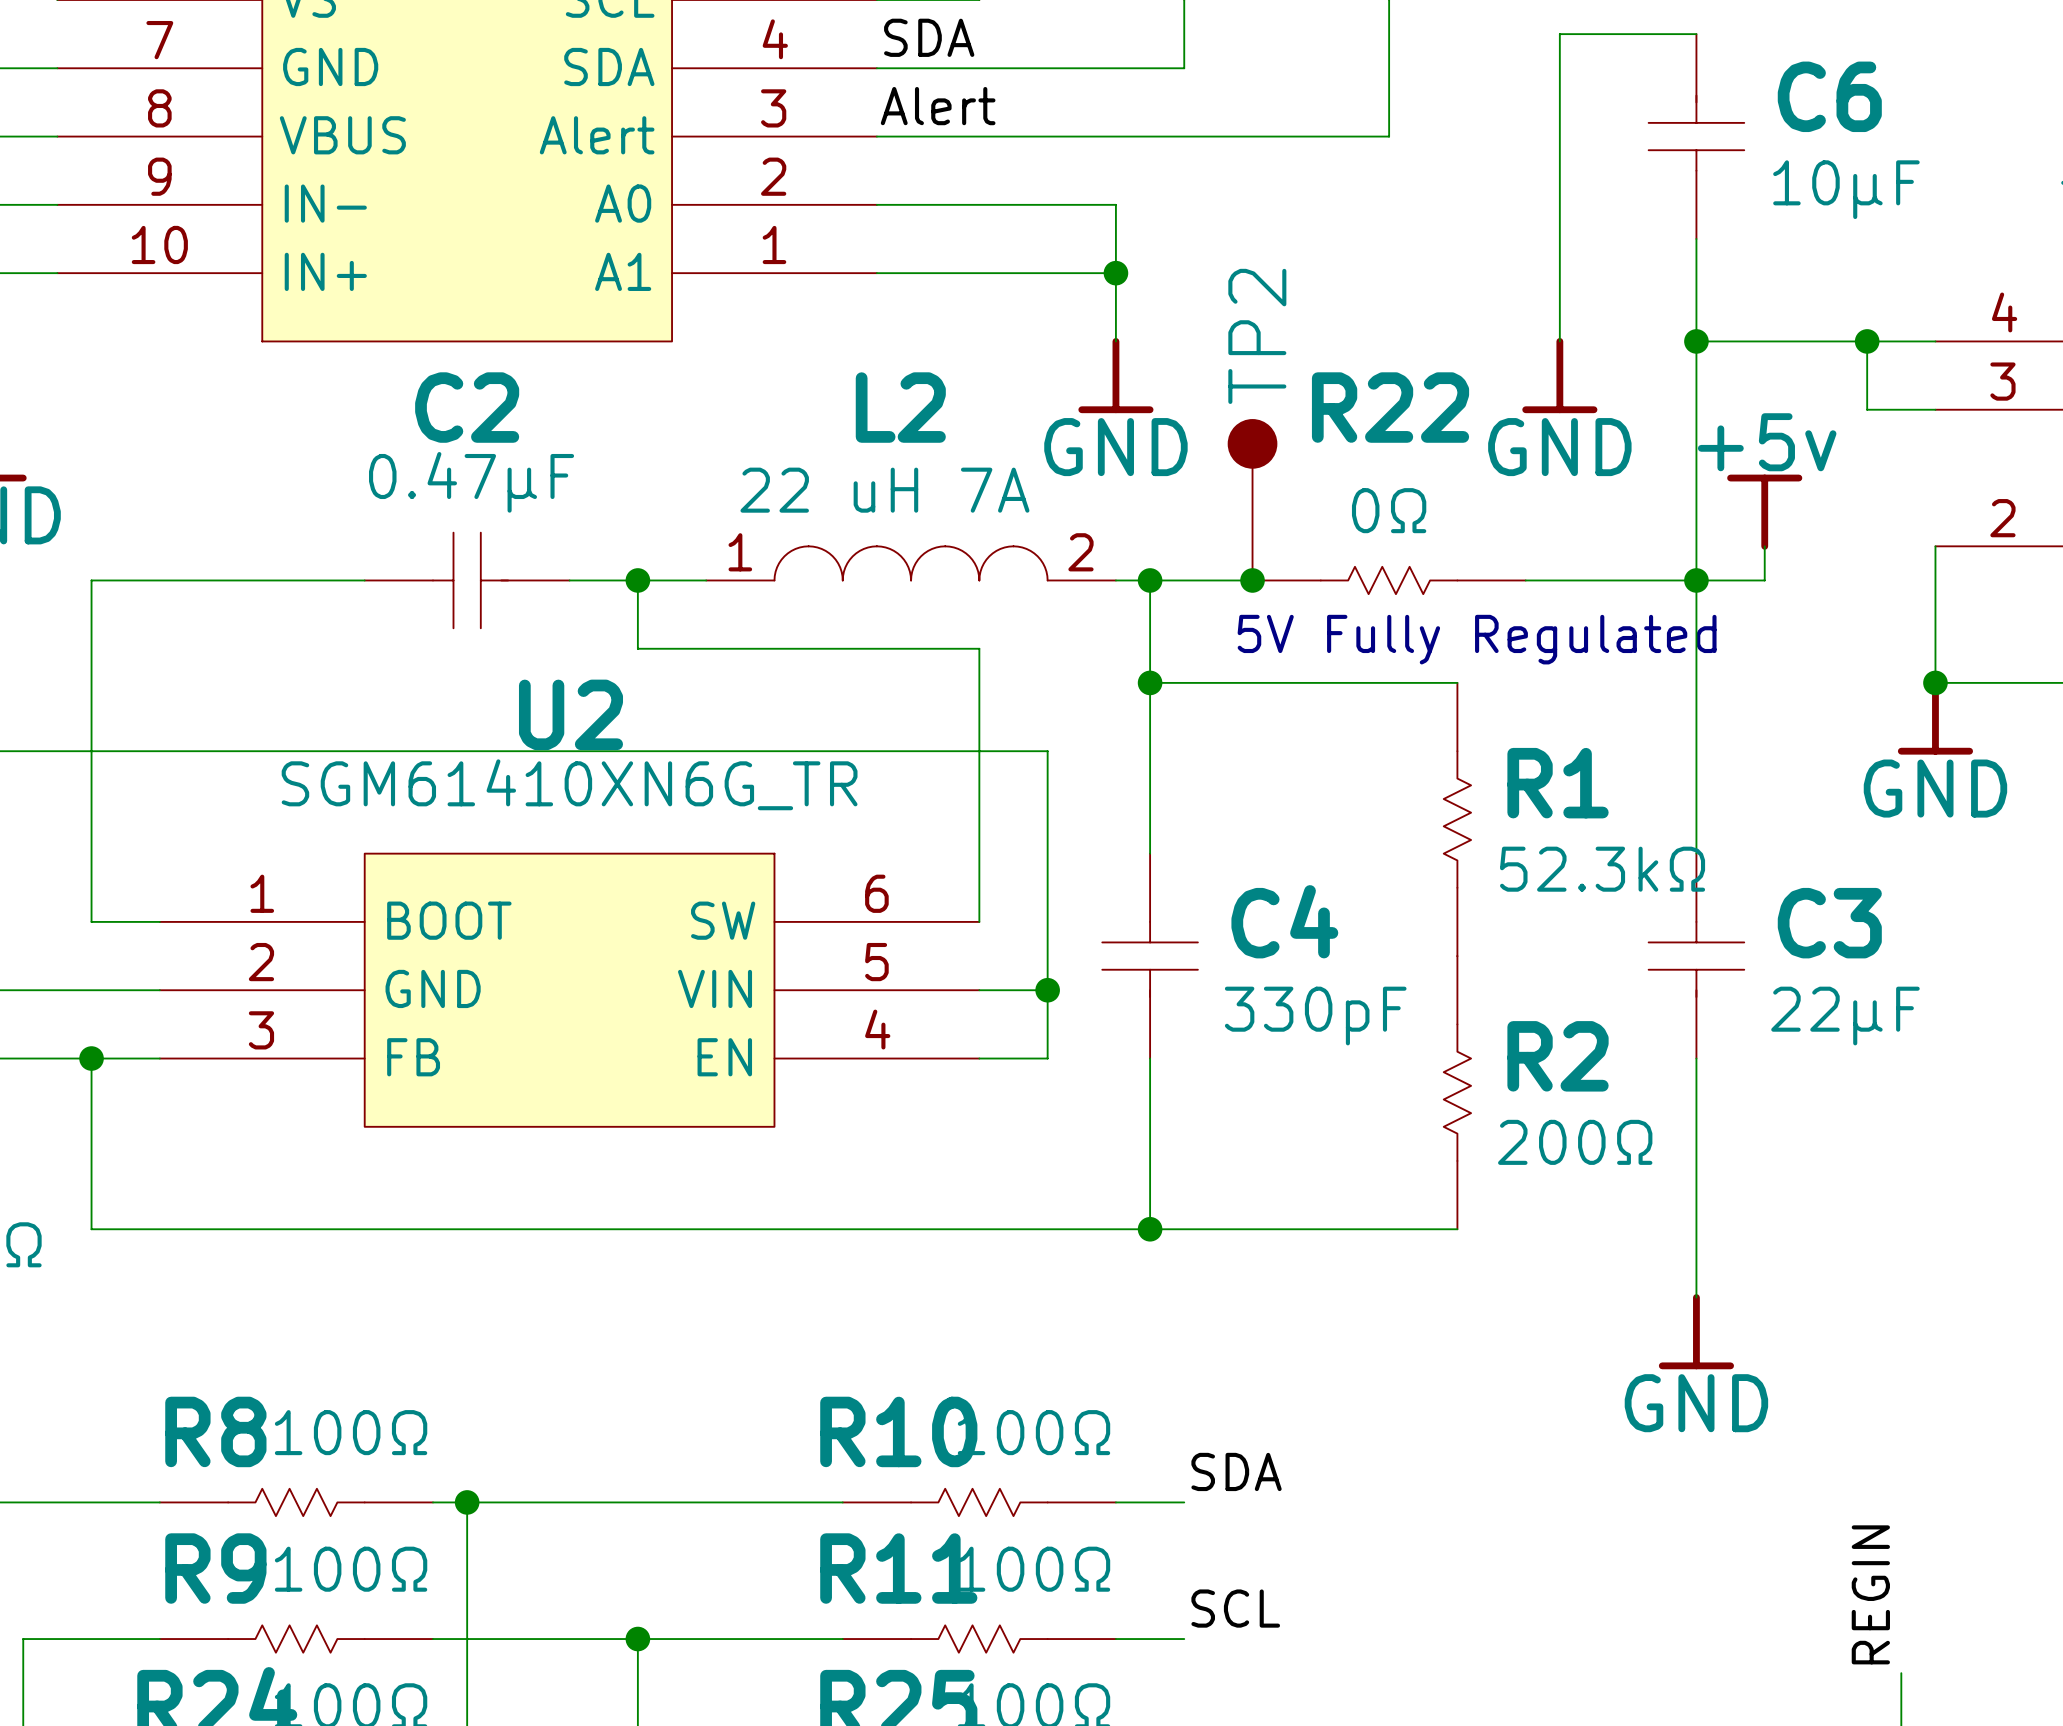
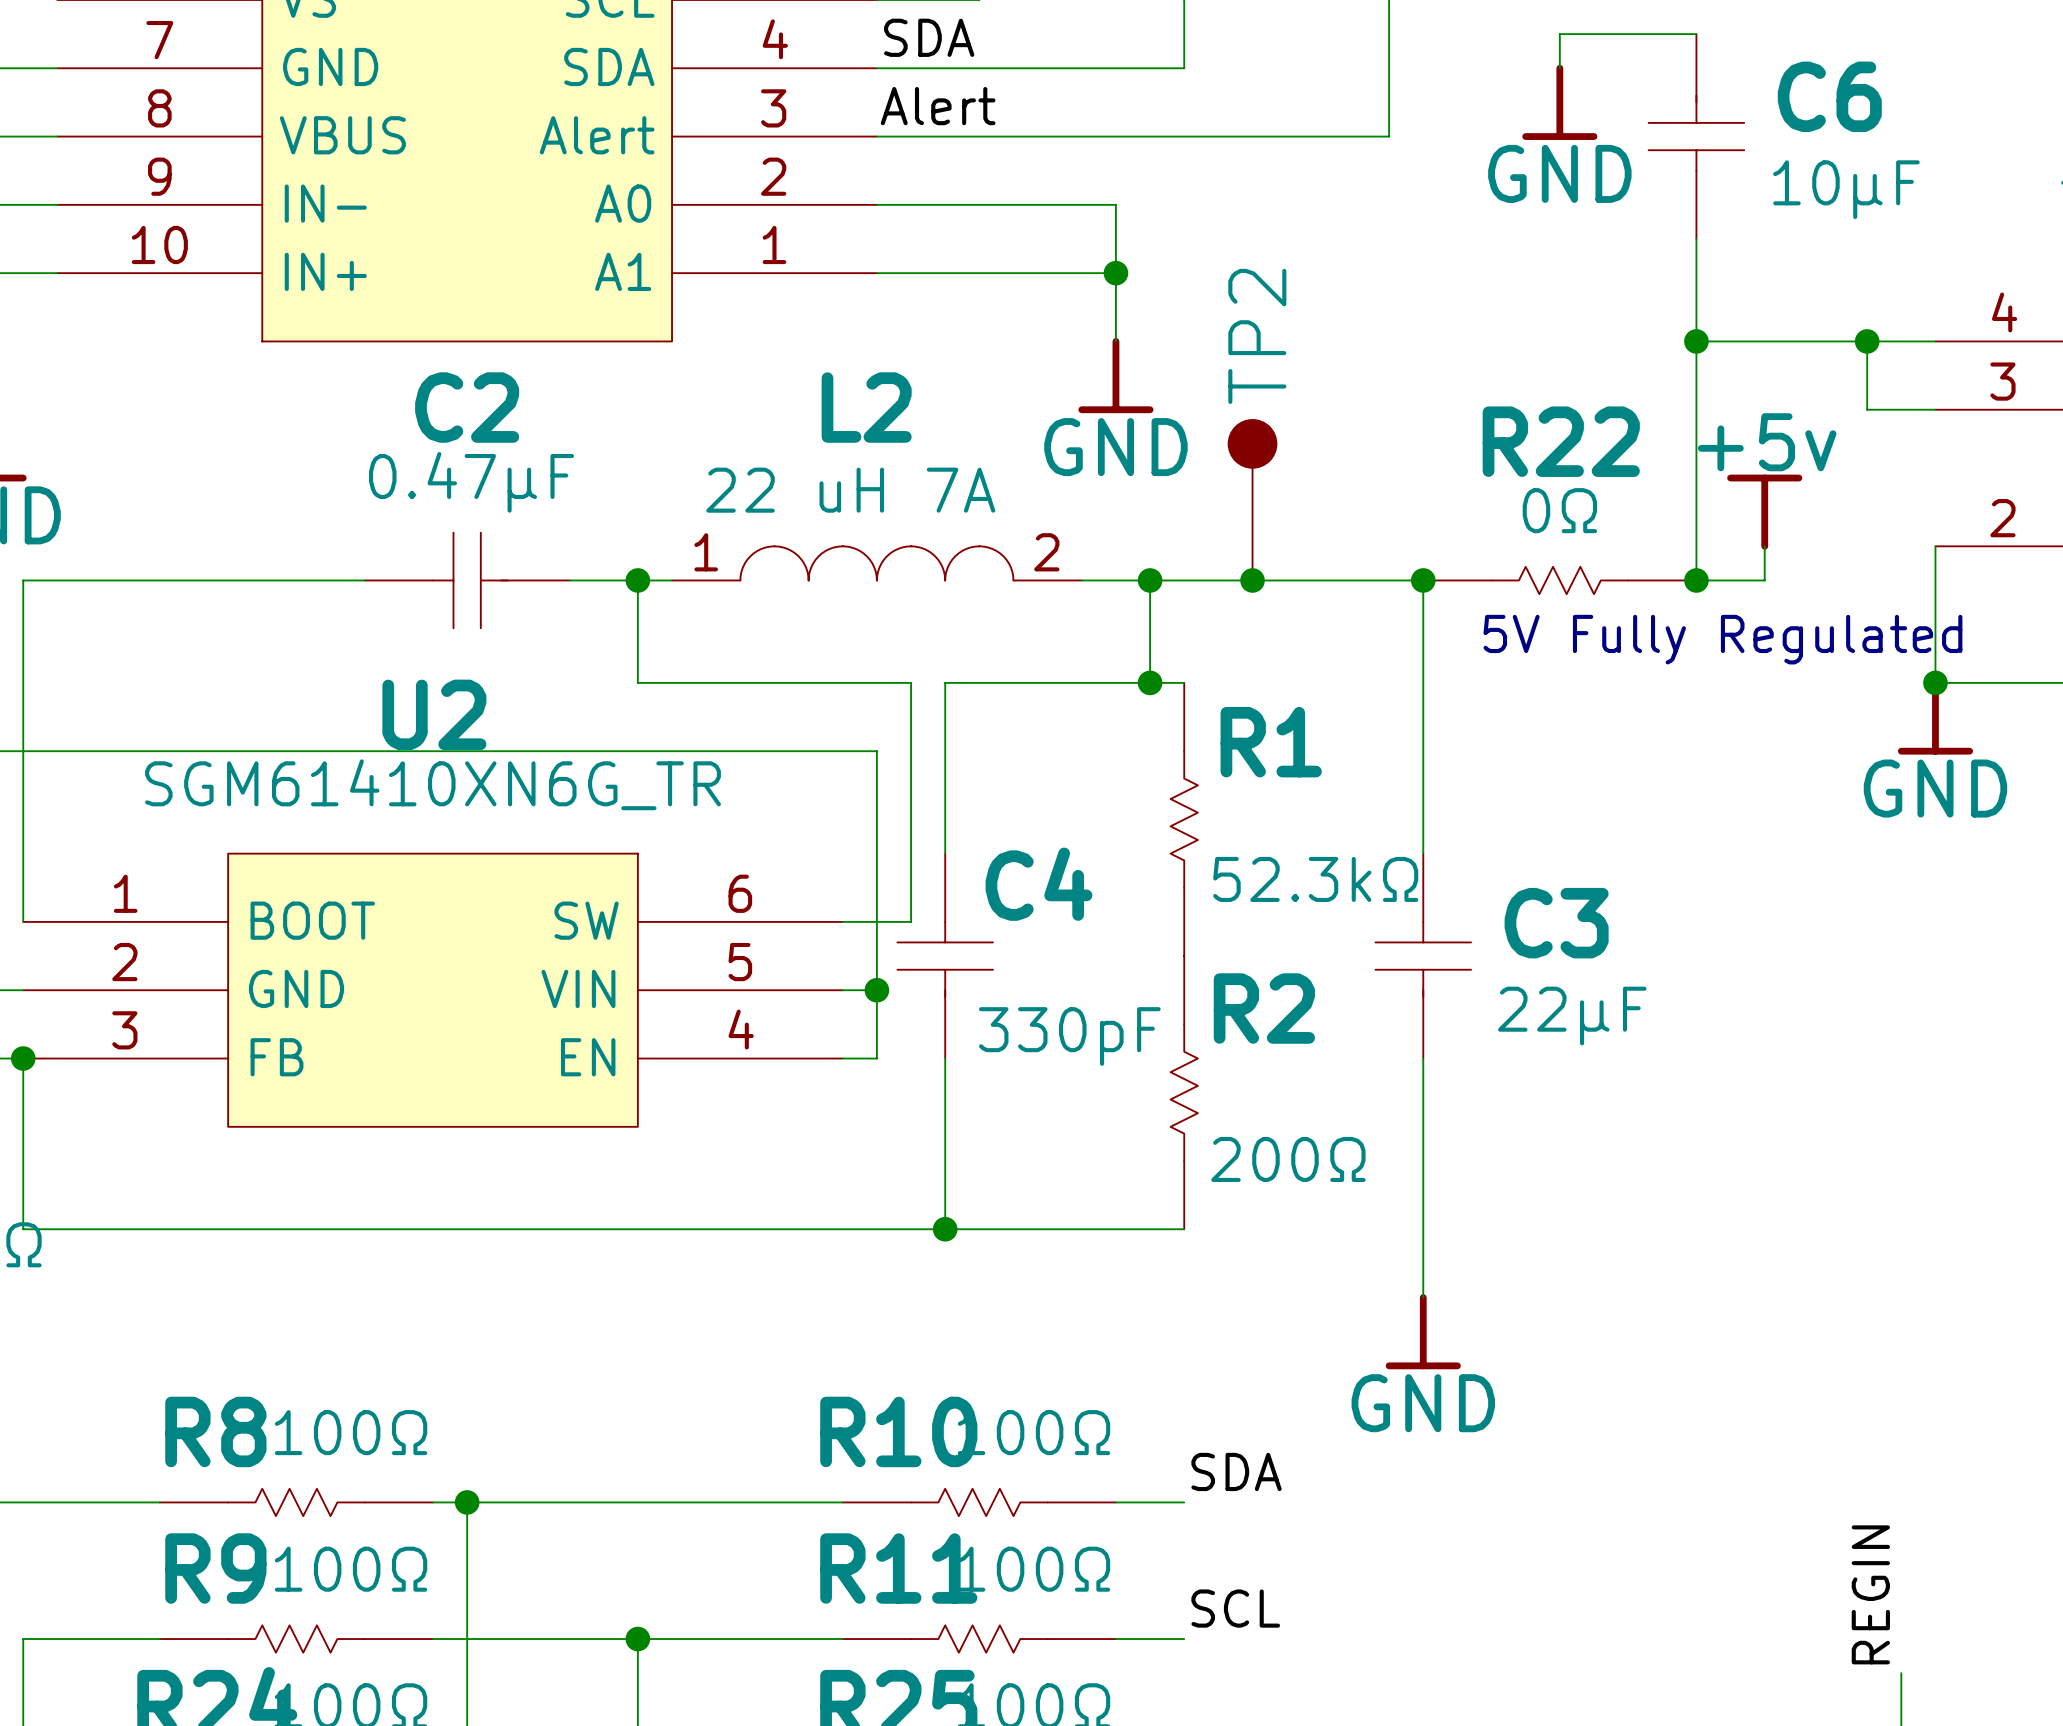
wire: (1559, 68) (1559, 341) -> none
power symbol position: GND (1559, 375) -> GND (1559, 102)
R22 name position: R22 (1390, 407) -> R22 (1561, 441)
L2 position: (911, 563) -> (876, 563)
wire: (91, 580) (91, 921) (159, 921) -> (91, 580) (23, 580) (23, 921)
R22 position: (1389, 580) -> (1559, 580)
junction: none -> (1423, 580)
wire: (1525, 580) (1696, 580) (1696, 853) -> (1252, 580) (1423, 580) (1423, 853)
text position: 5V Fully Regulated (1477, 639) -> 5V Fully Regulated (1722, 639)
wire: (637, 648) (979, 648) (979, 921) -> (637, 648) (637, 682) (911, 682) (911, 921) (842, 921)
wire: (1150, 682) (1150, 853) -> (1150, 682) (945, 682) (945, 853)
wire: (1184, 682) (1457, 682) -> none
wire: (876, 751) (1047, 751) (1047, 1058) (979, 1058) -> (876, 751) (876, 1058) (842, 1058)
R1 name position: R1 (1558, 783) -> R1 (1271, 742)
R1 position: (1457, 819) -> (1184, 819)
R1 value position: 52.3kΩ (1602, 869) -> 52.3kΩ (1315, 879)
C4 name position: C4 (1284, 921) -> C4 (1038, 884)
C4 position: (1150, 956) -> (945, 956)
C3 position: (1696, 956) -> (1423, 956)
U2 position: (569, 990) -> (433, 990)
junction: none -> (876, 990)
wire: (979, 990) (1047, 990) -> none
junction: (1047, 990) -> none
C4 value position: 330pF (1315, 1016) -> 330pF (1069, 1036)
R2 name position: R2 (1558, 1056) -> R2 (1264, 1008)
wire: (91, 1058) (91, 1229) -> (23, 1058) (23, 1229) (91, 1229)
junction position: (91, 1058) -> (23, 1058)
wire: (1150, 1058) (1150, 1229) -> (945, 1058) (945, 1229)
wire: (1696, 1058) (1696, 1297) -> (1423, 1058) (1423, 1297)
R2 position: (1457, 1092) -> (1184, 1092)
R2 value position: 200Ω (1575, 1142) -> 200Ω (1288, 1159)
junction: none -> (945, 1229)
junction: (1150, 1229) -> none
wire: (1184, 1229) (1457, 1229) -> none
power symbol position: GND (1696, 1331) -> GND (1423, 1331)

